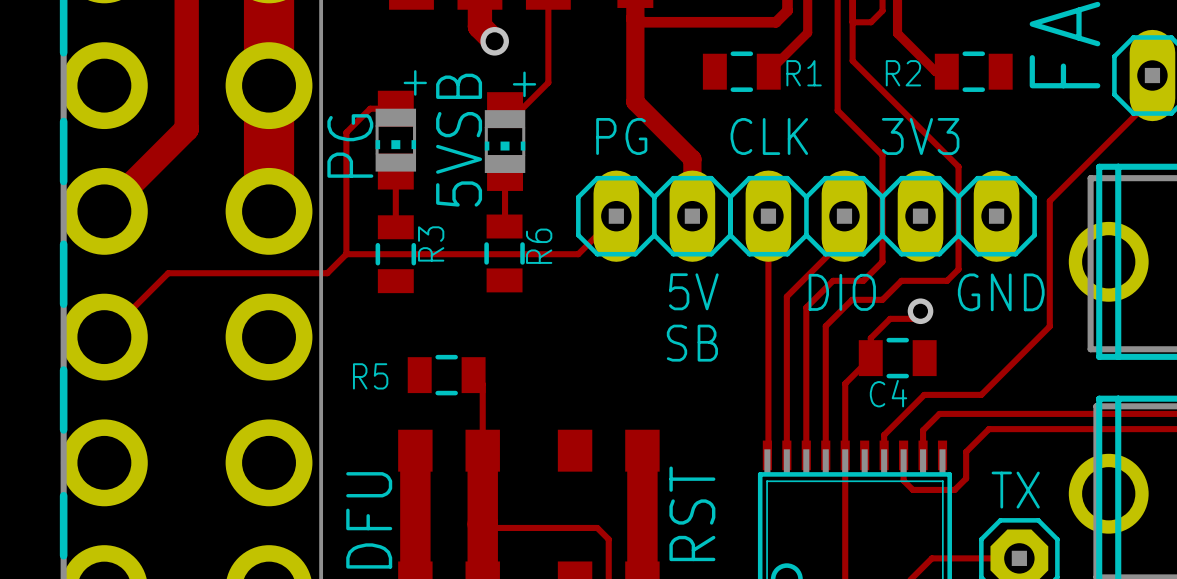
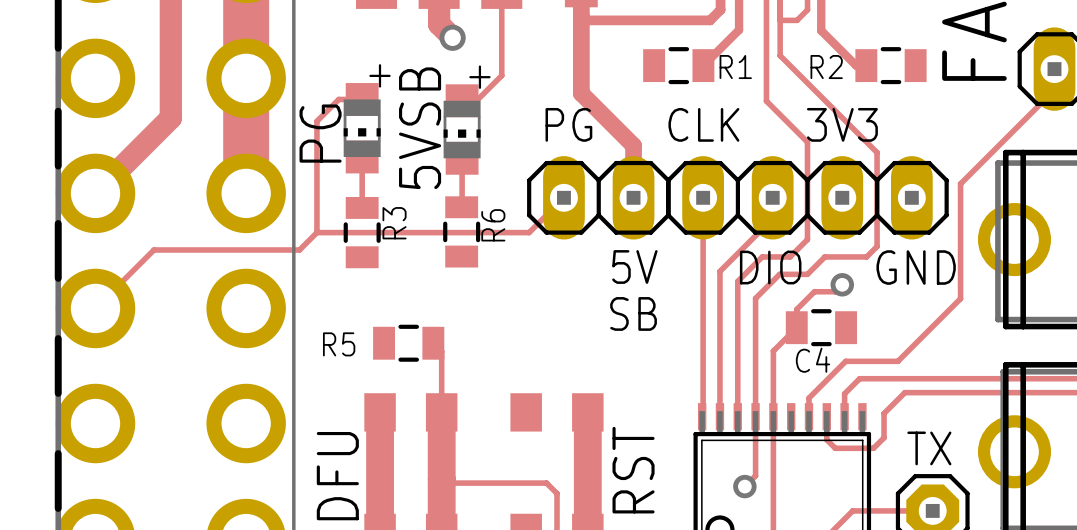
track: none -> (755, 416) (755, 475) (744, 486)
via: none -> (744, 486)

